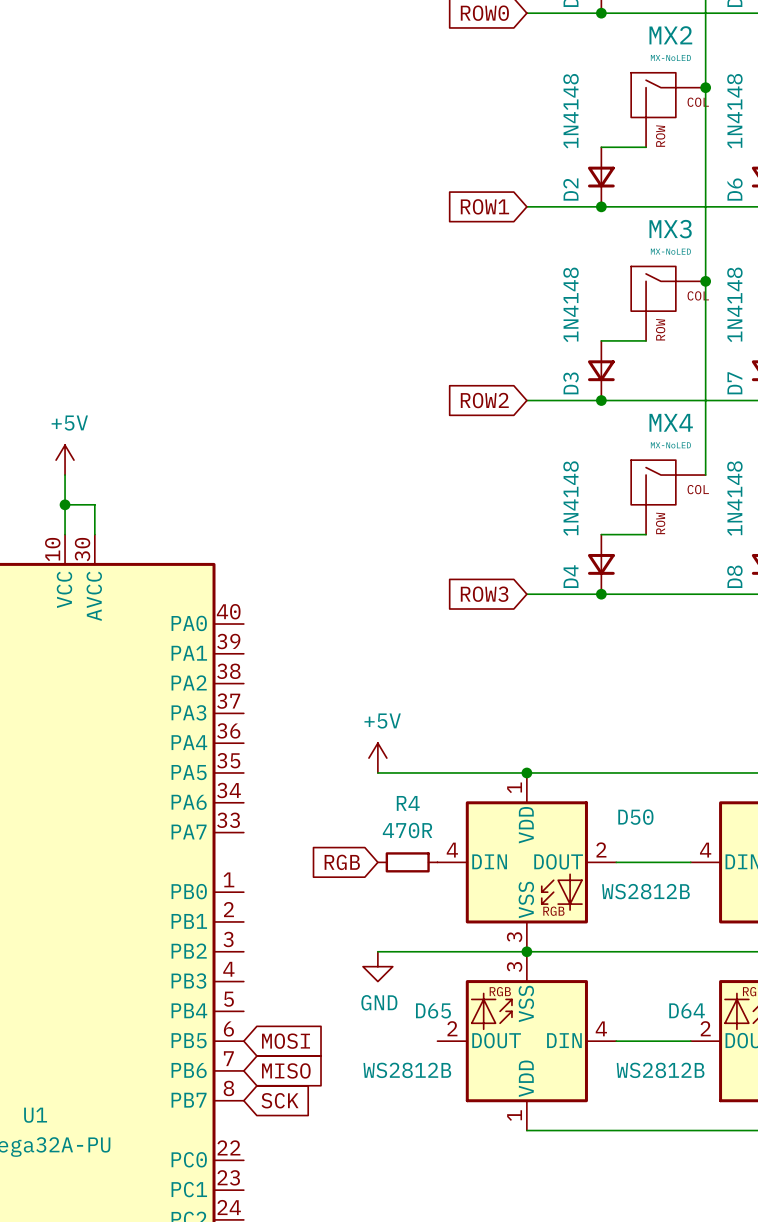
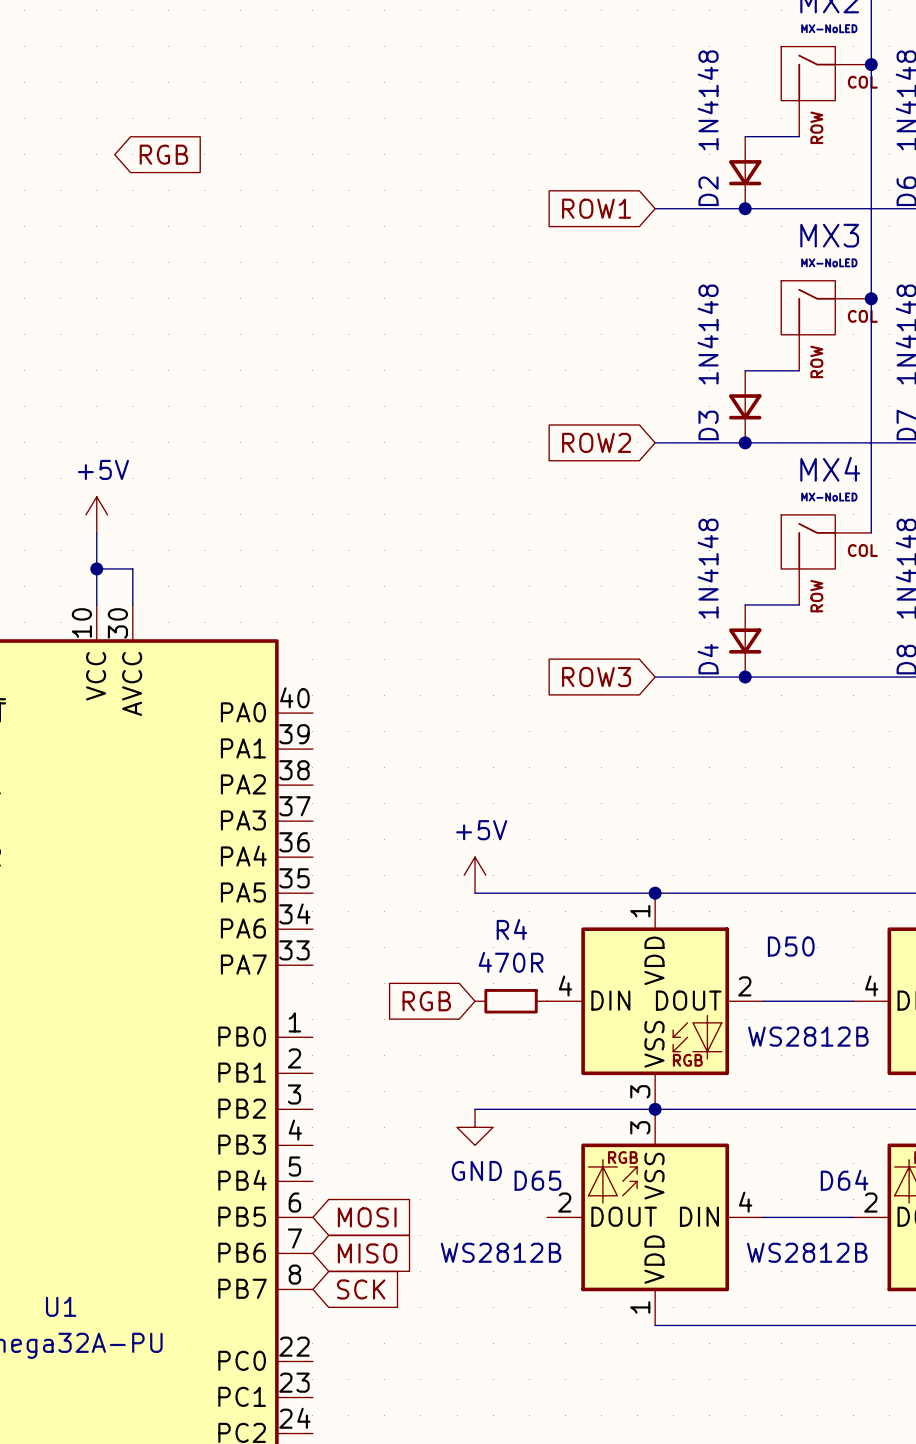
global label: none -> RGB (163, 154)

